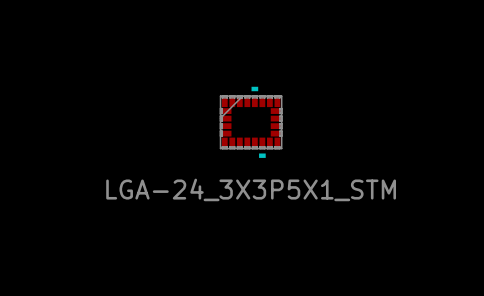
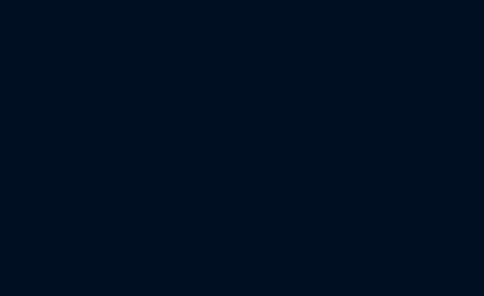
part: LGA-24_3X3P5X1_STM (251, 122) -> none

